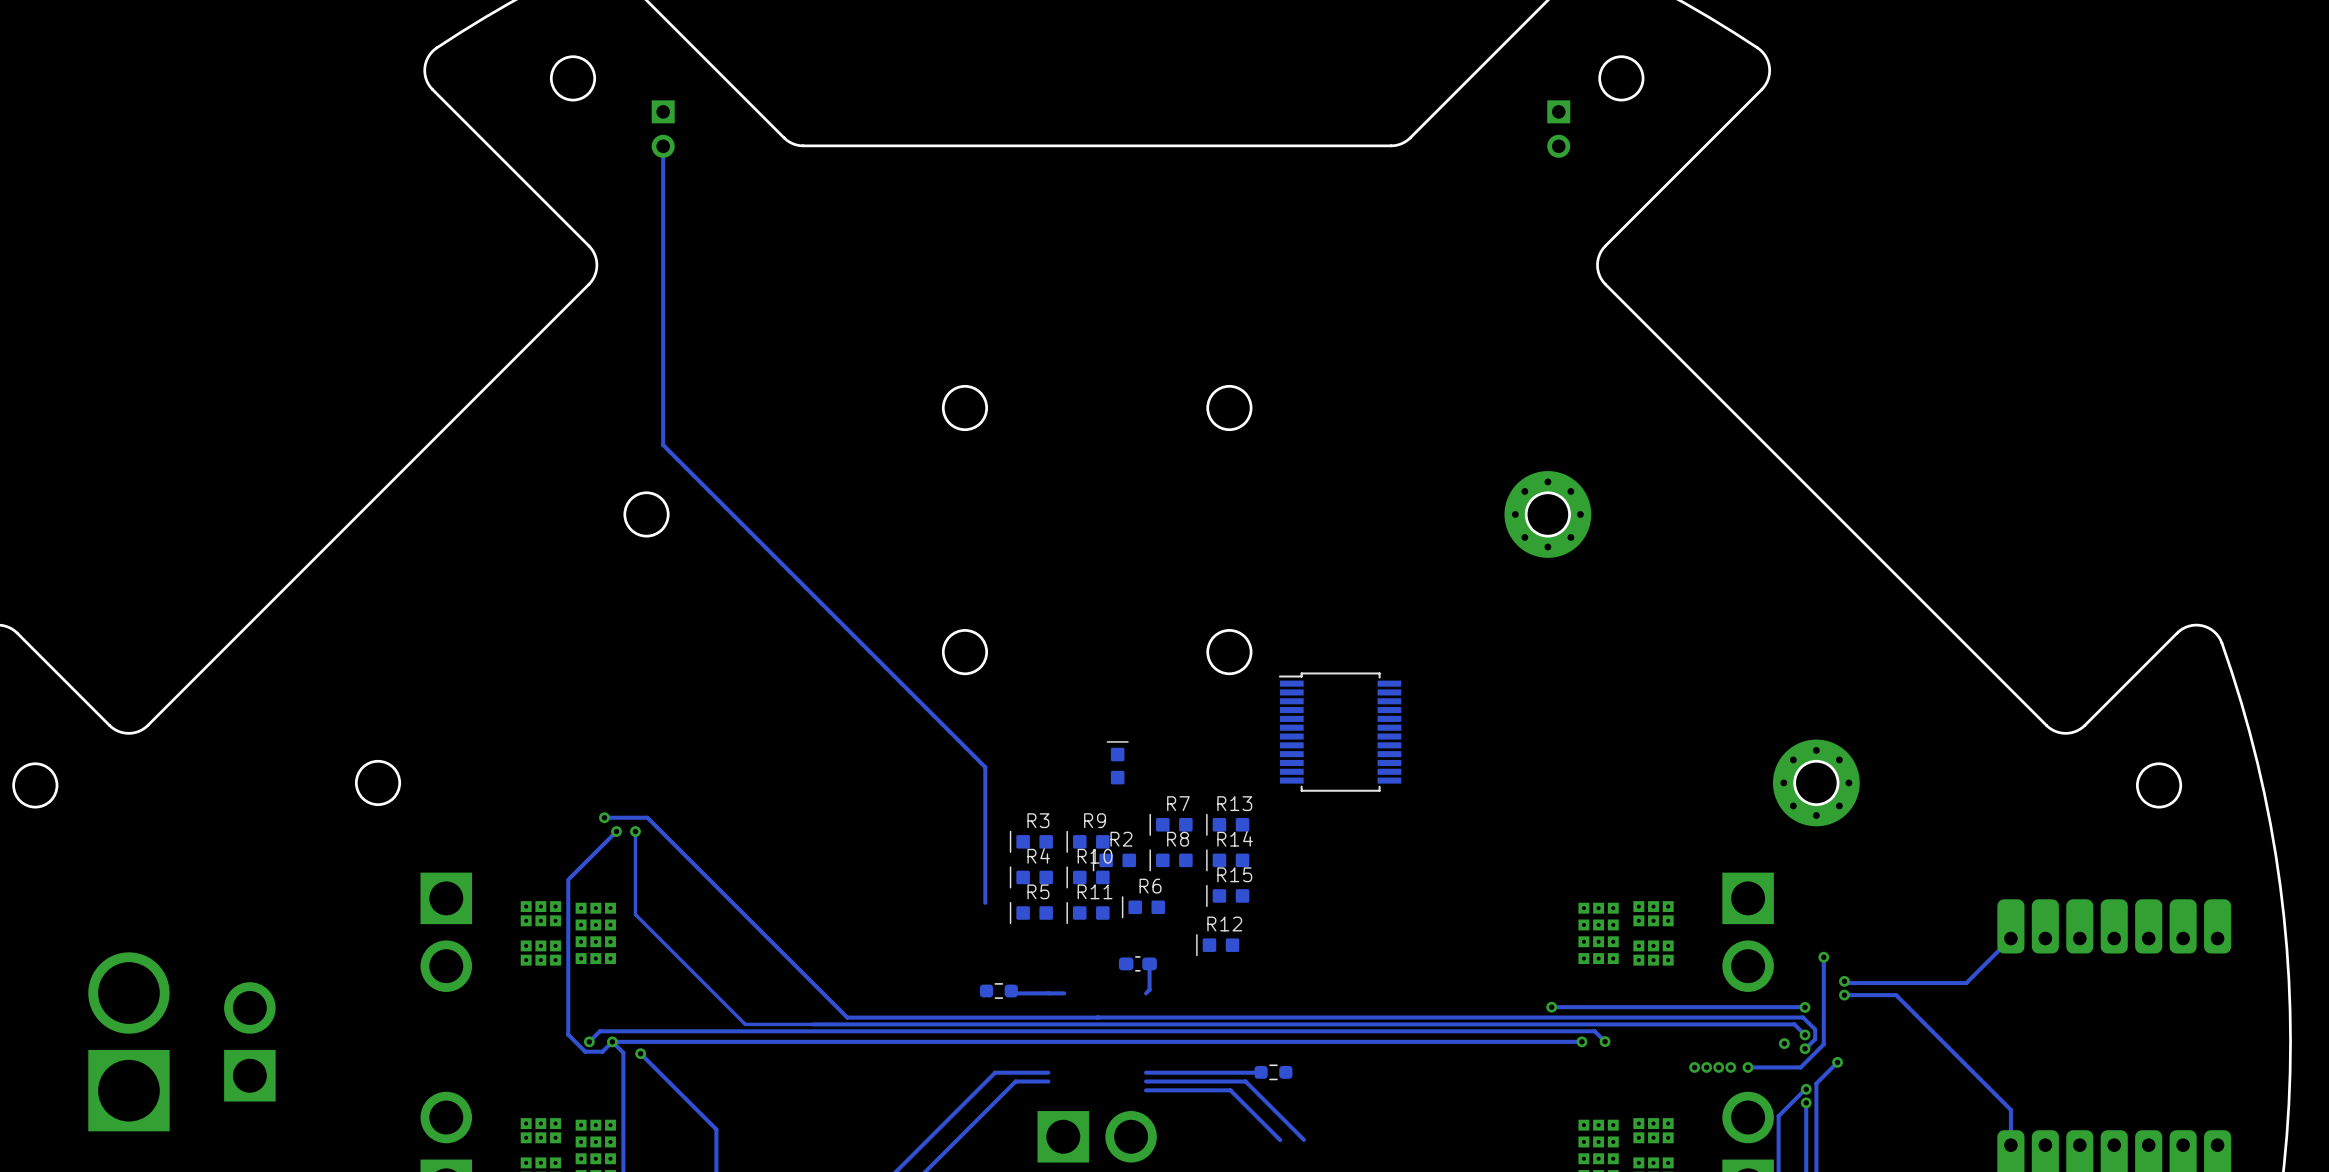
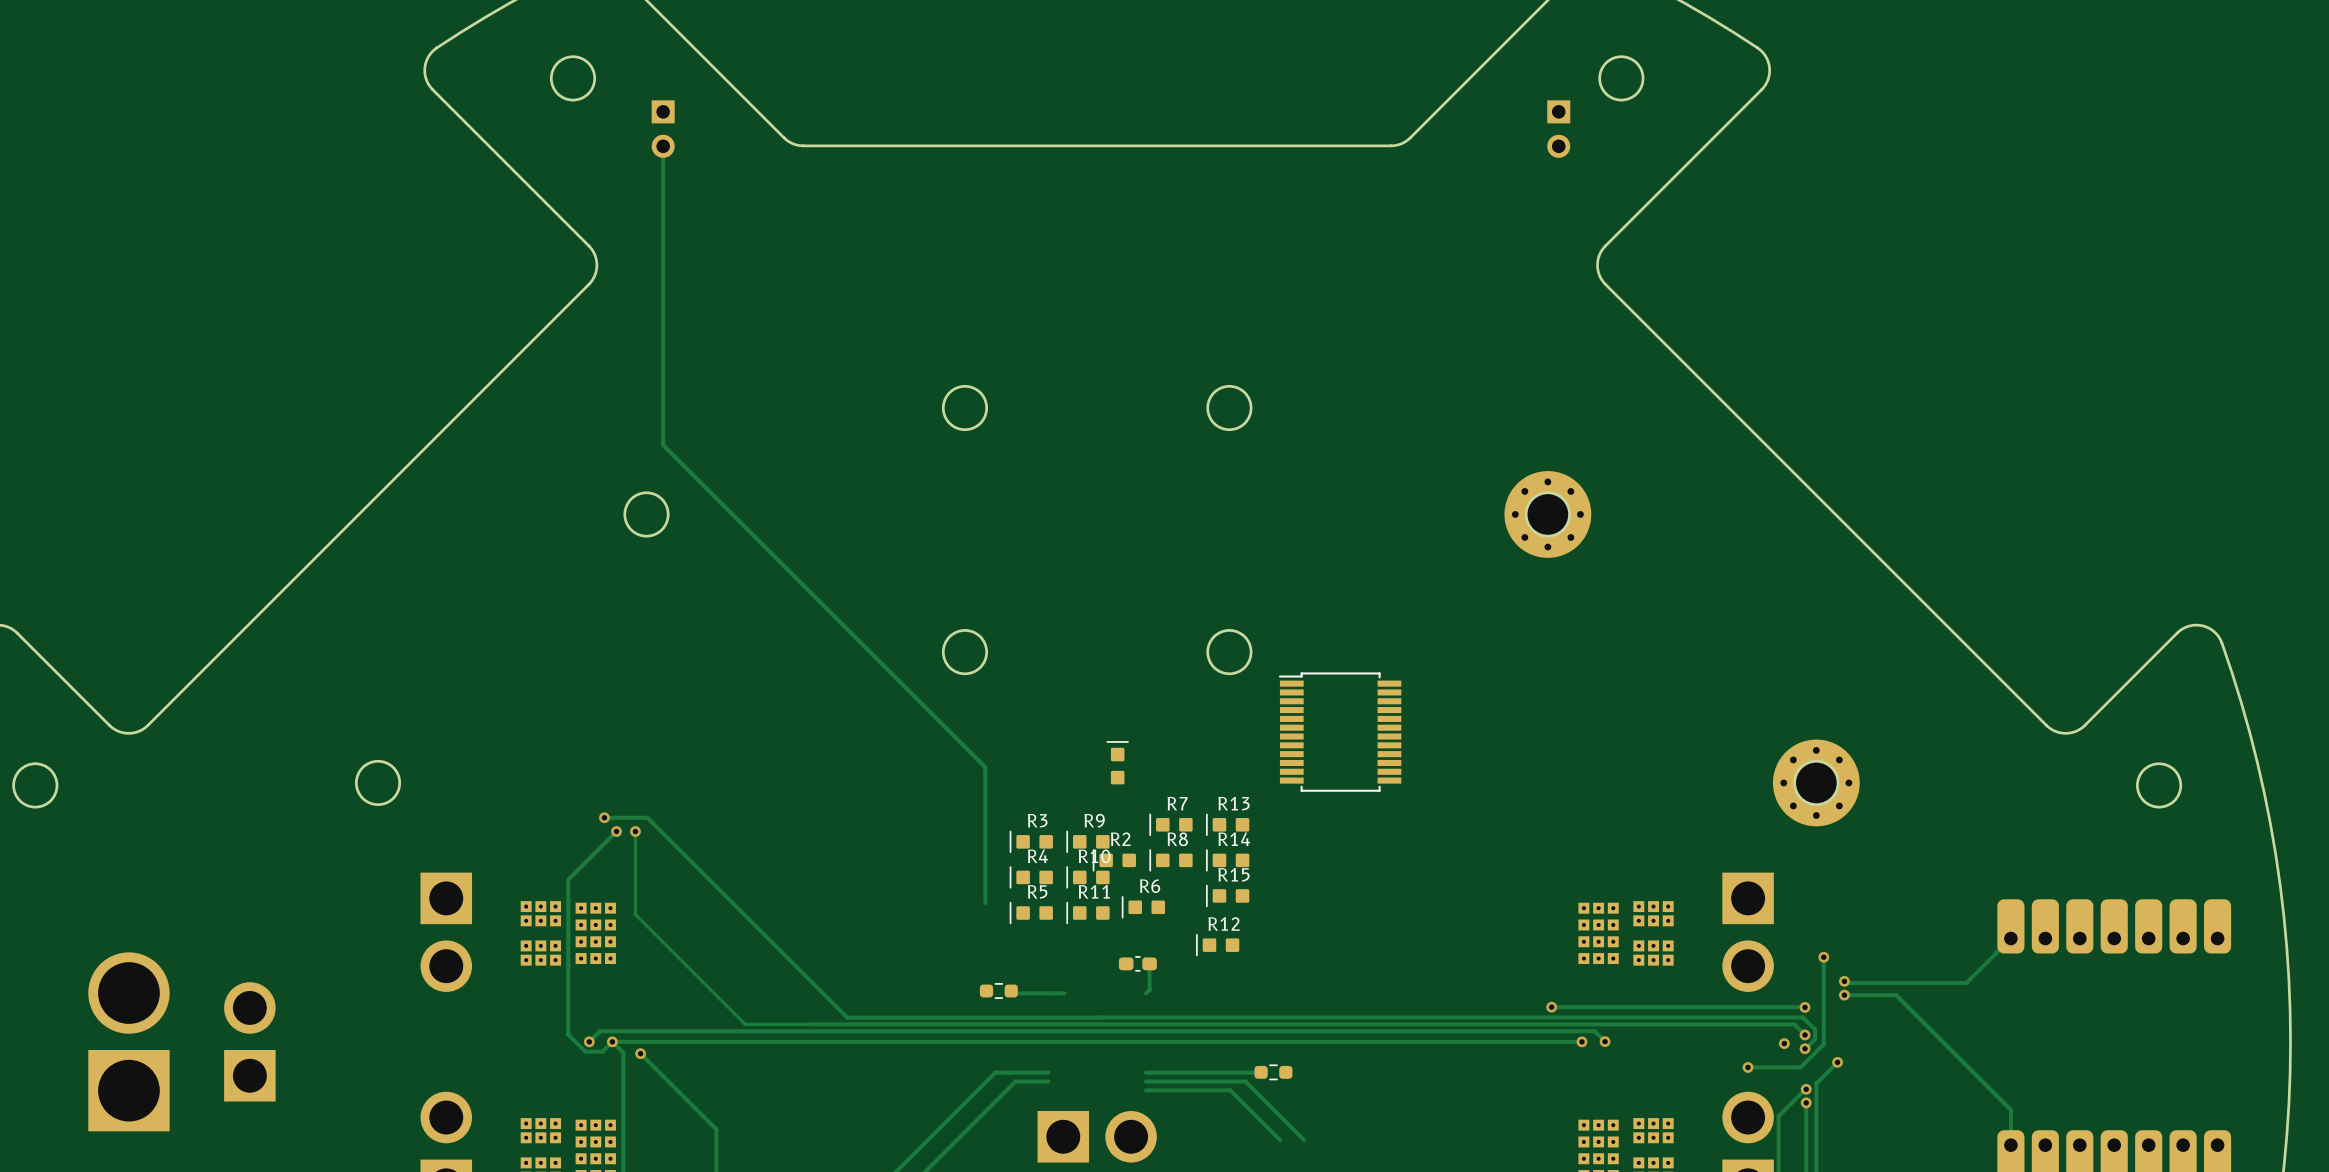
via: (1694, 1067) -> none
via: (1706, 1067) -> none
via: (1718, 1067) -> none
via: (1730, 1067) -> none

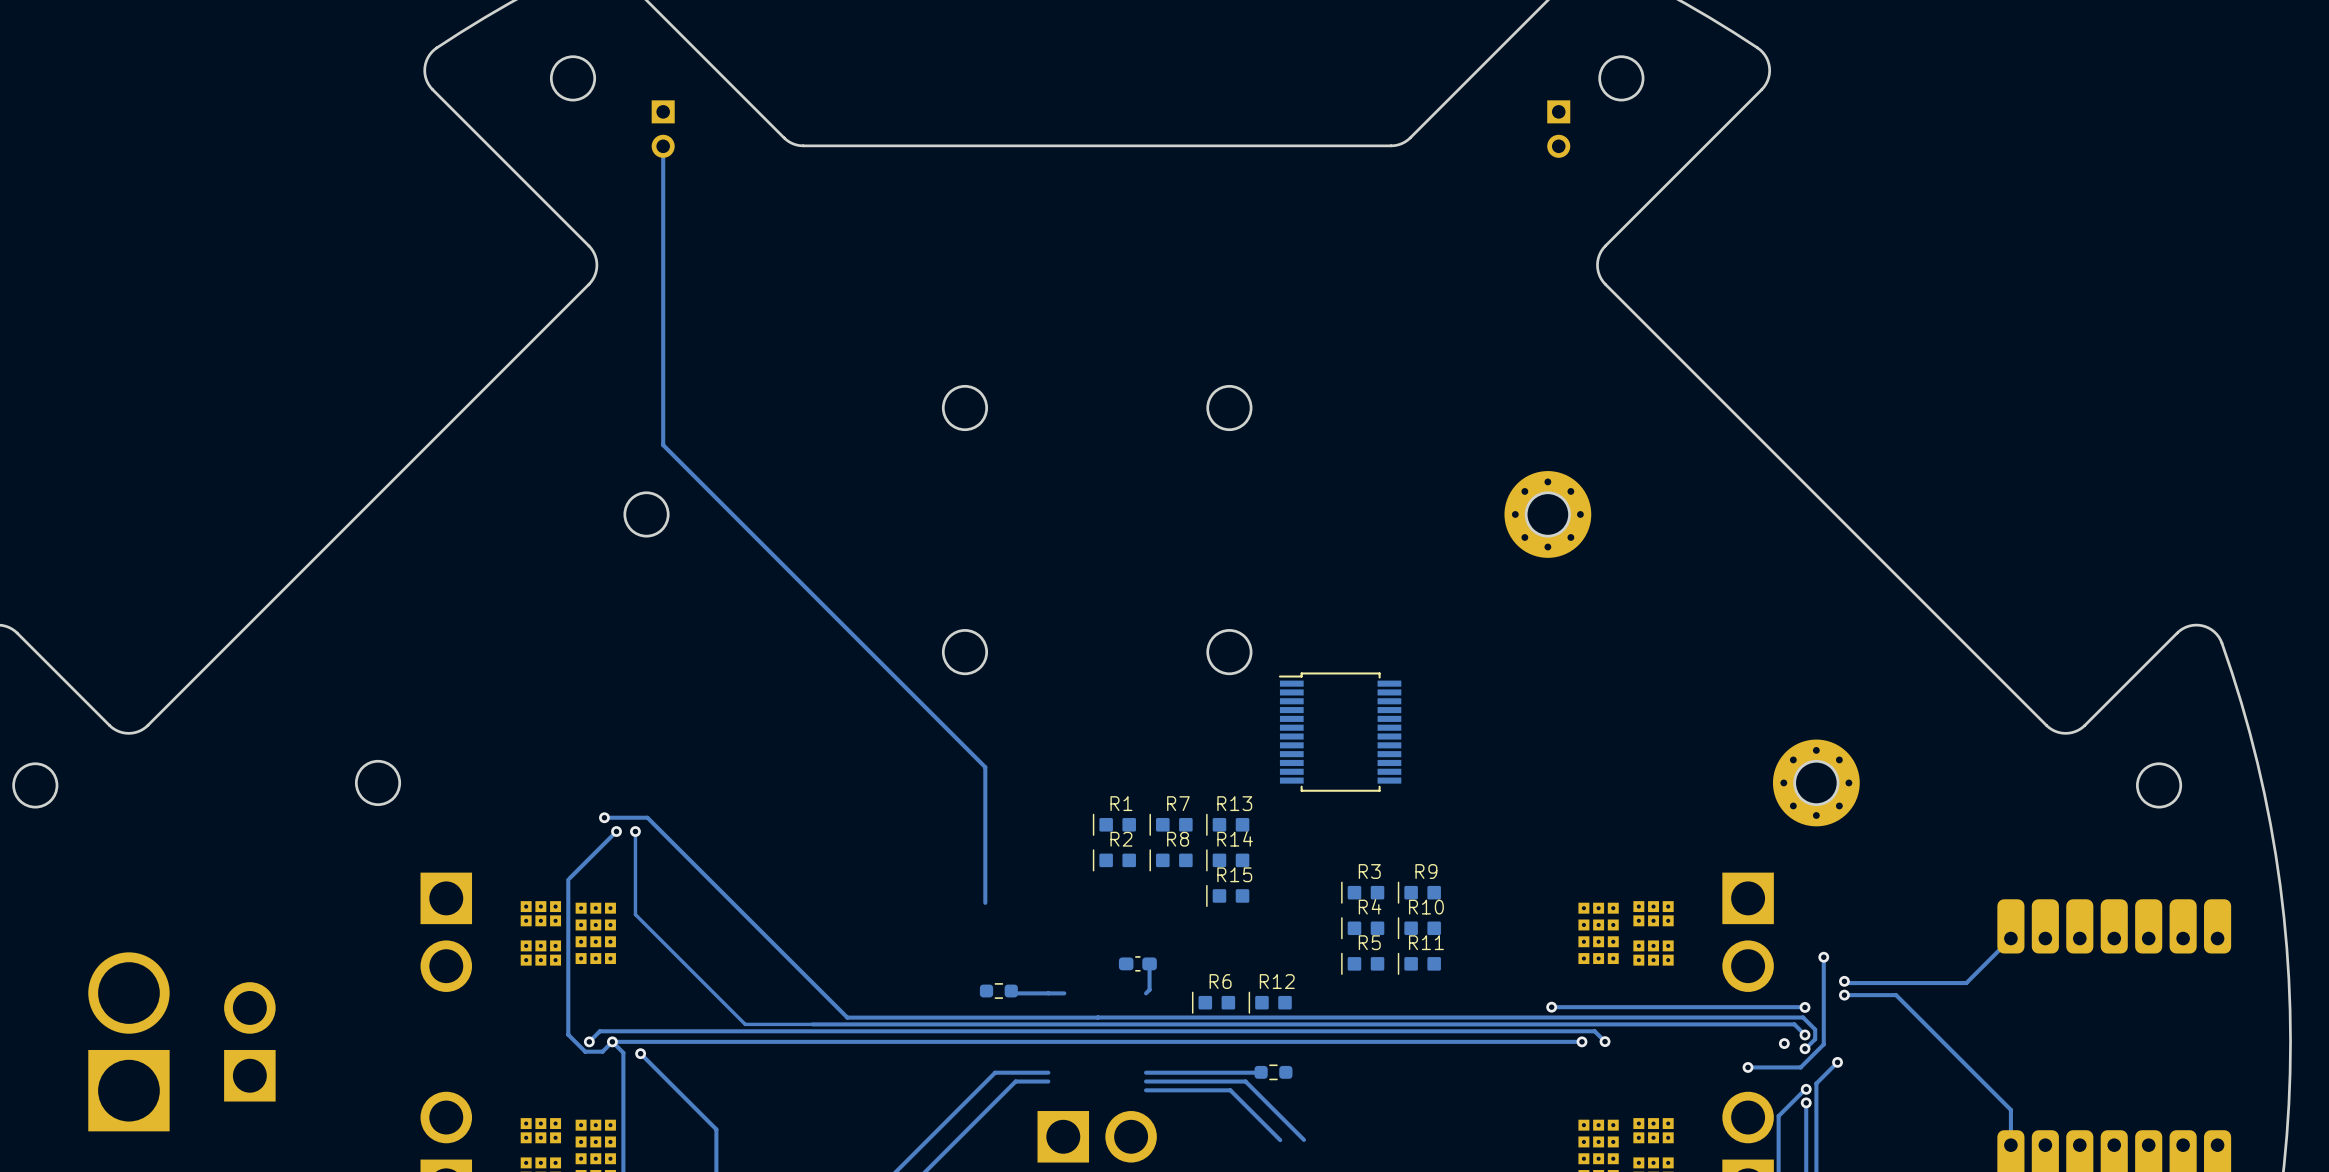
part: (1117, 762) -> none
R1: none -> (1114, 824)
R3 position: (1031, 841) -> (1362, 892)
R9 position: (1088, 841) -> (1419, 892)
R4 position: (1031, 877) -> (1362, 928)
R10 position: (1088, 877) -> (1419, 928)
R6 position: (1143, 907) -> (1213, 1002)
R5 position: (1031, 913) -> (1362, 963)
R11 position: (1088, 913) -> (1419, 963)
R12 position: (1217, 945) -> (1270, 1002)

